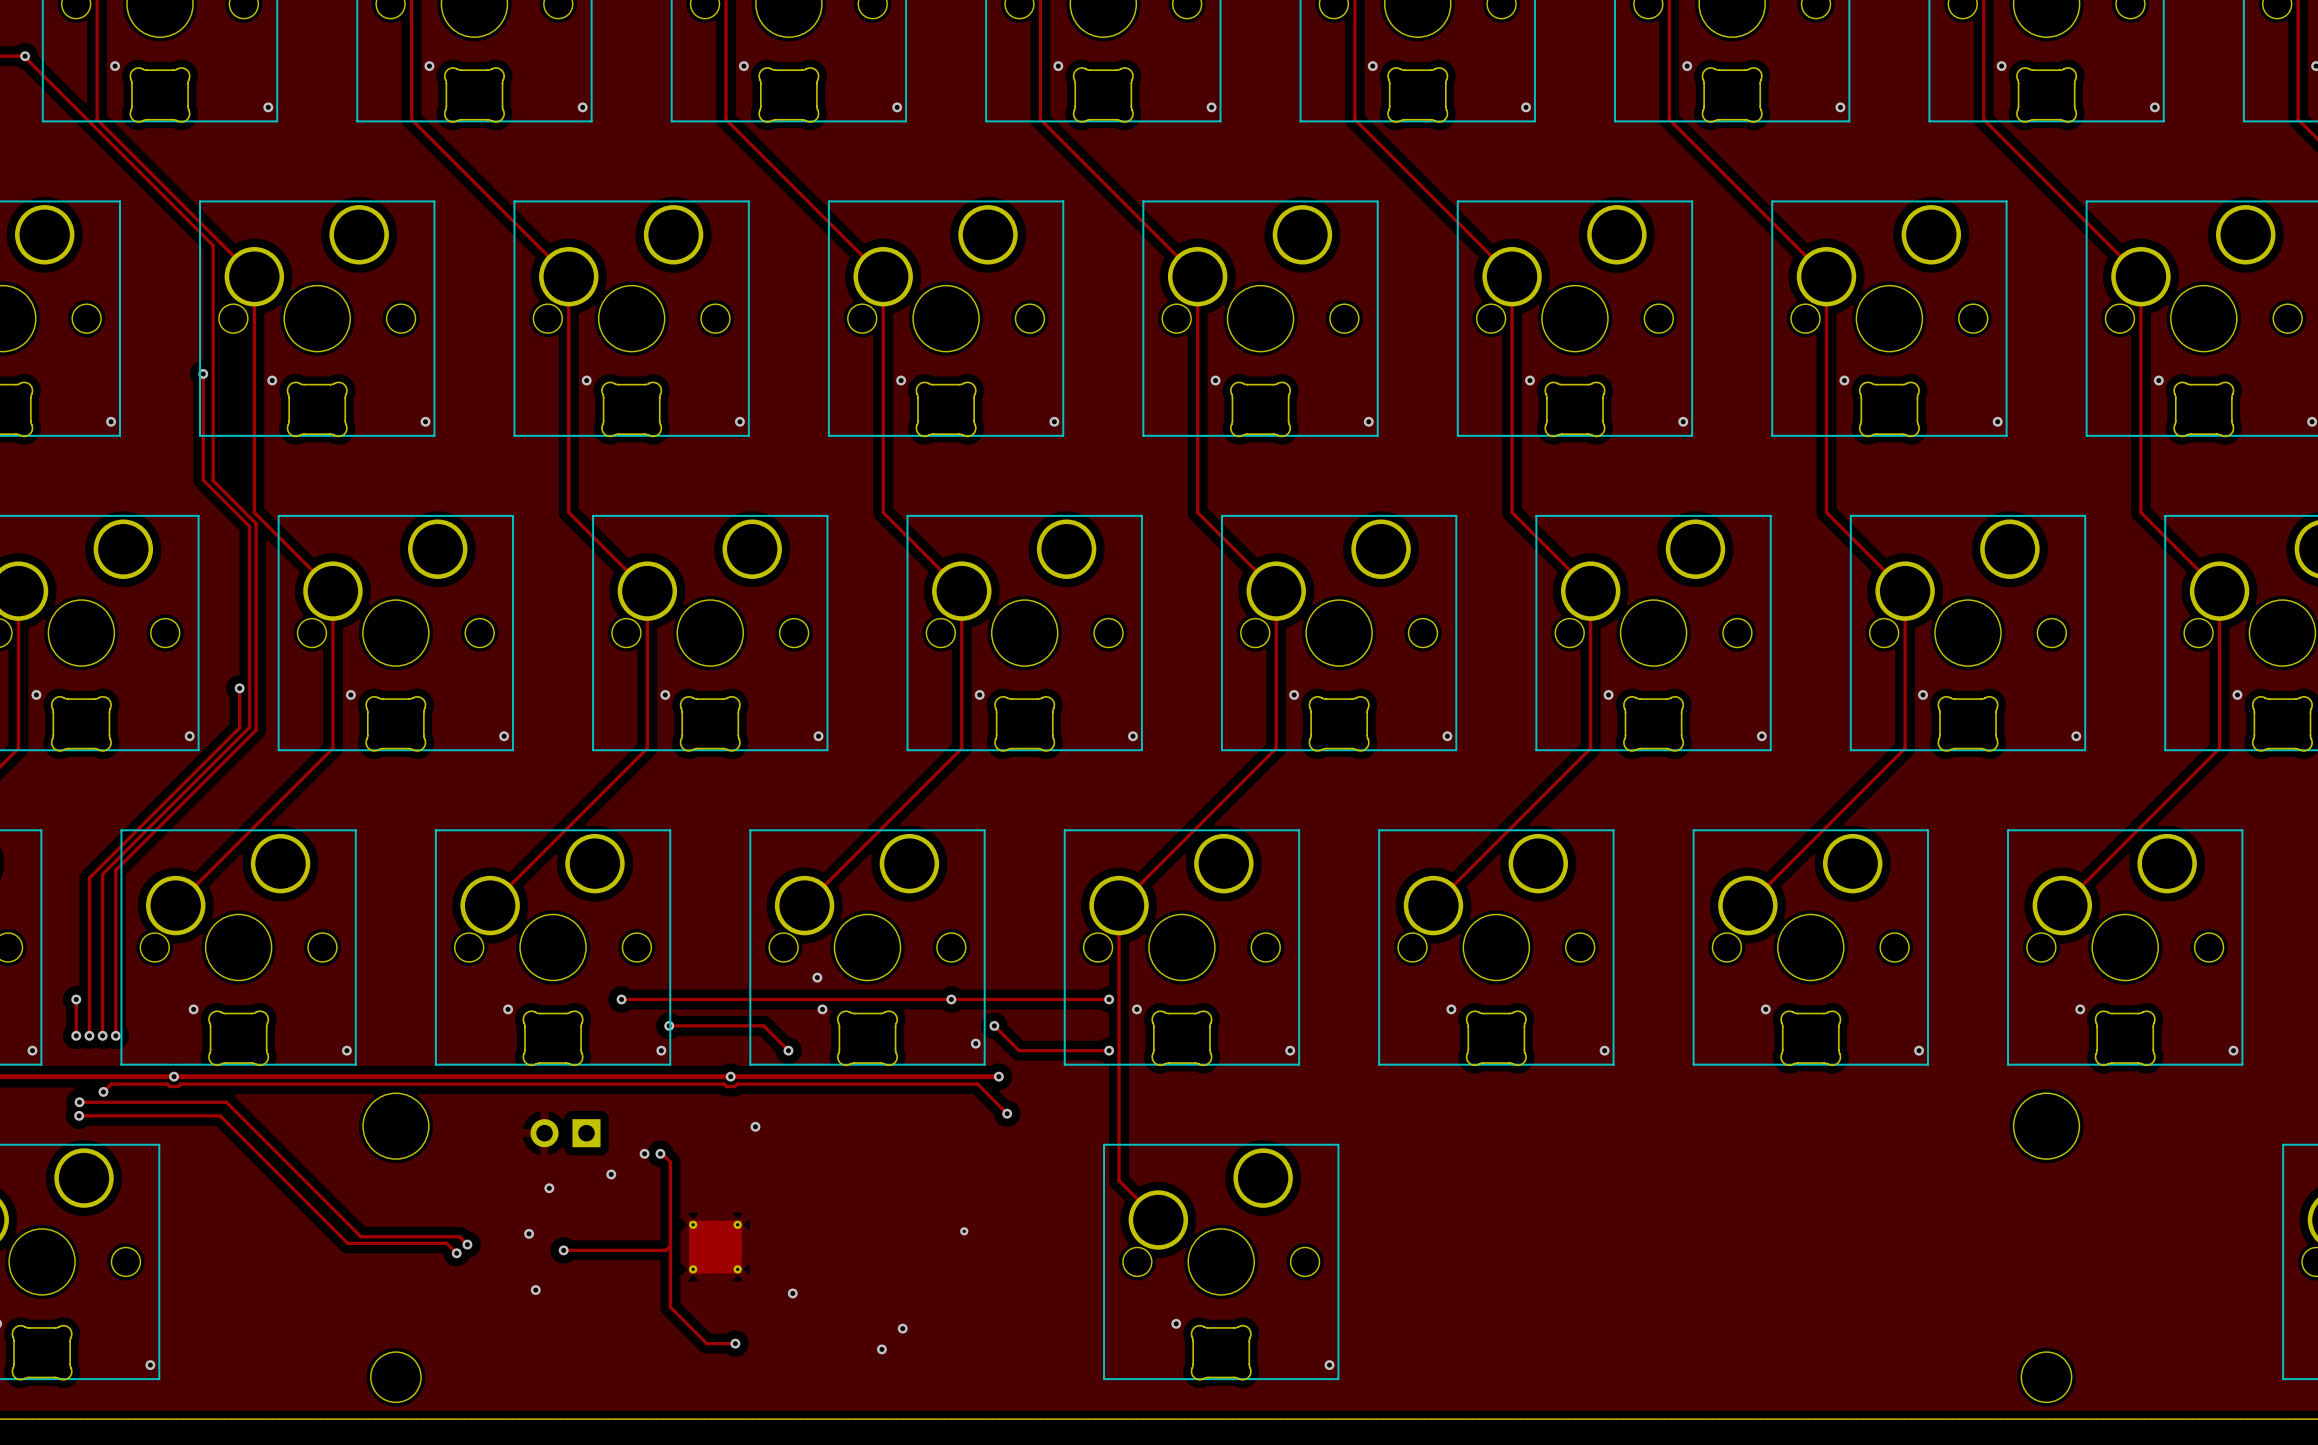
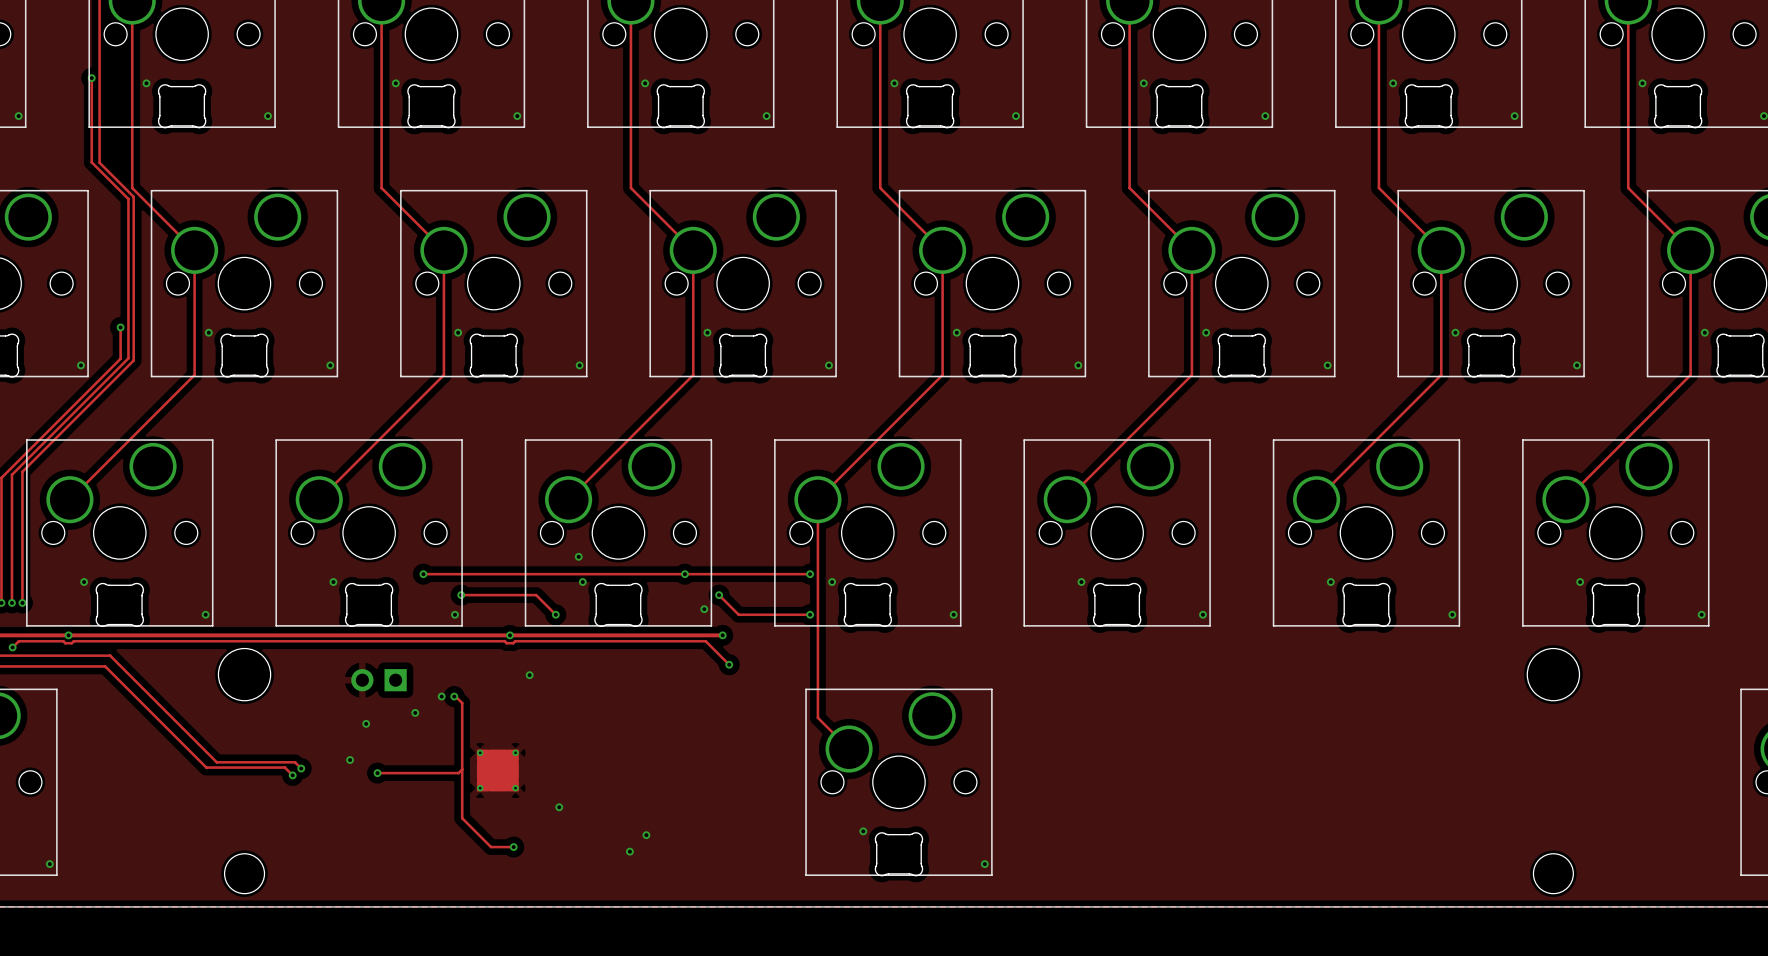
via: (964, 1231) -> none
via: (535, 1290) -> none

